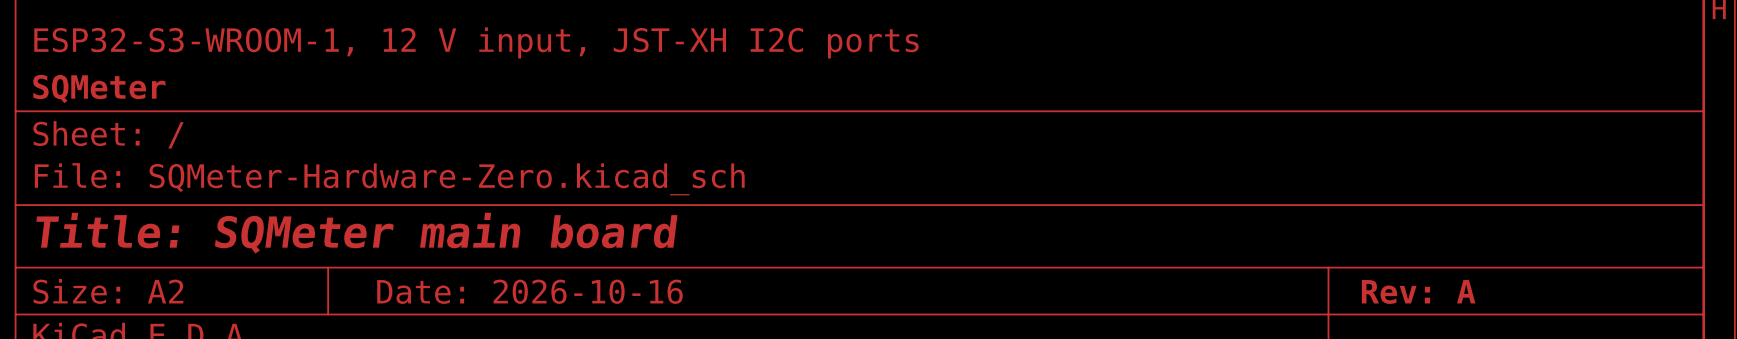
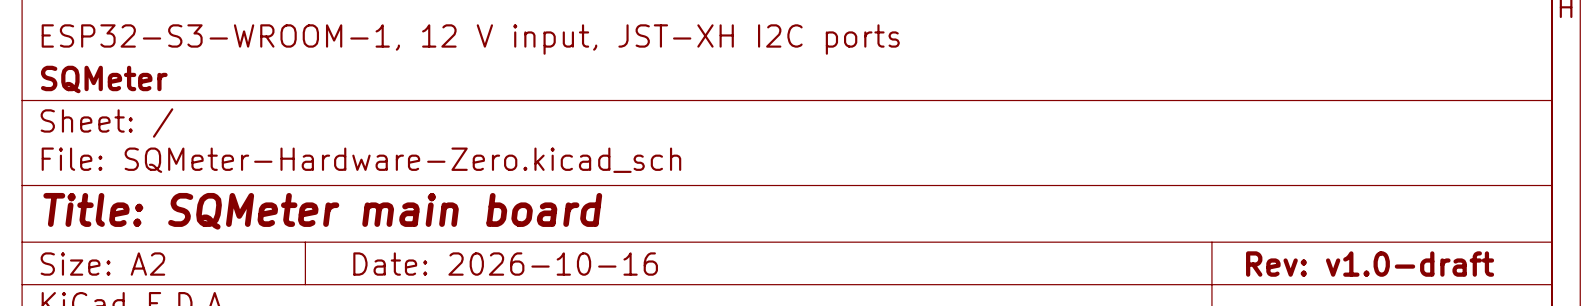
title block: Rev: A (1418, 291) -> Rev: v1.0-draft (1370, 264)

